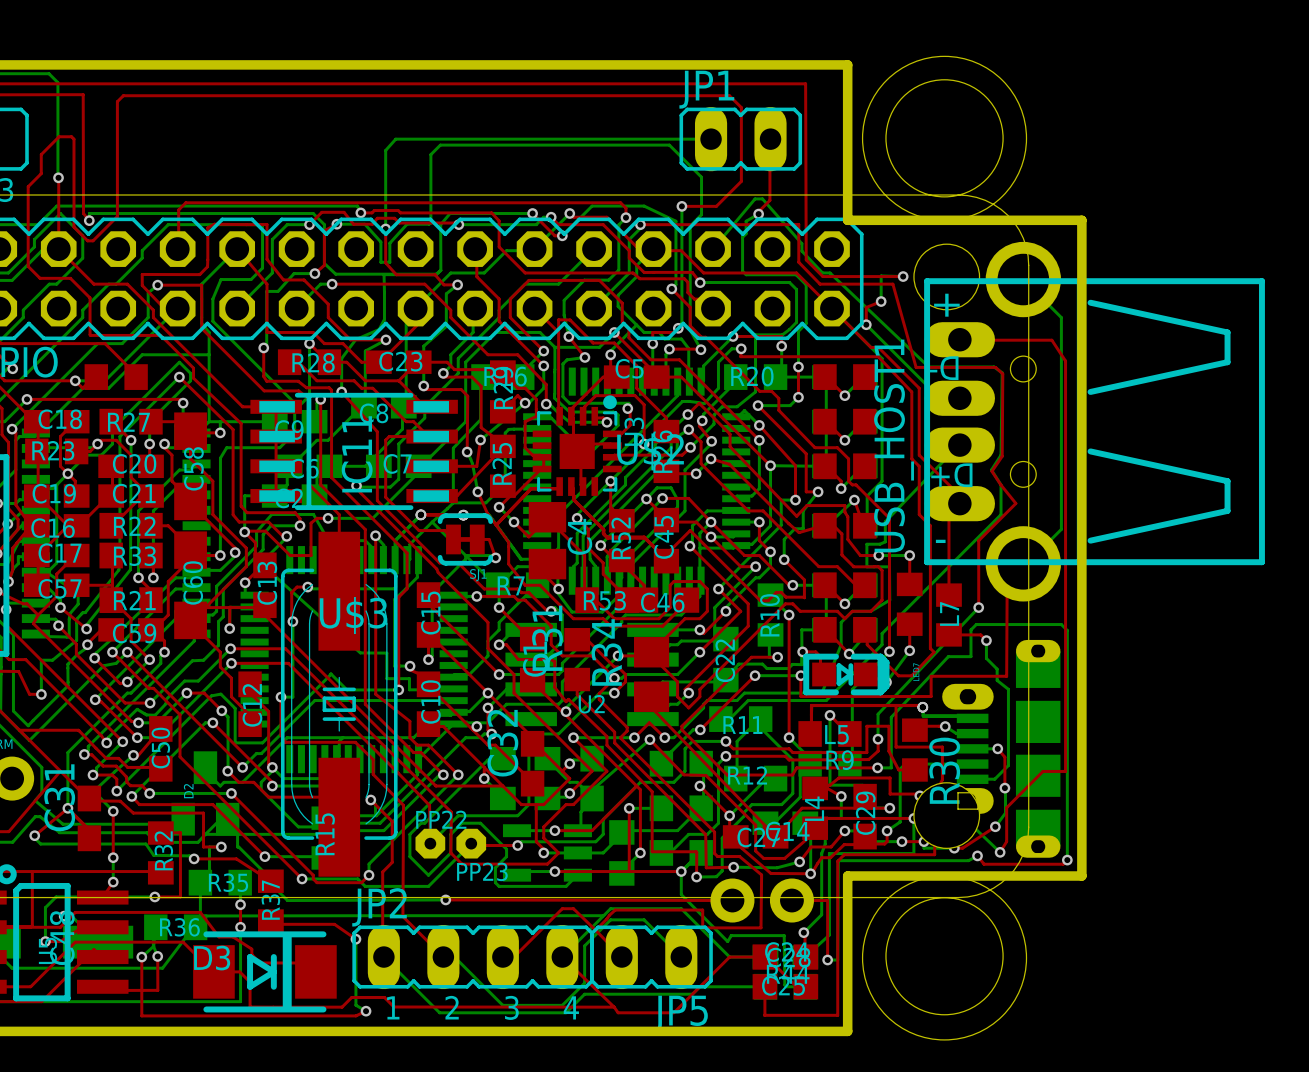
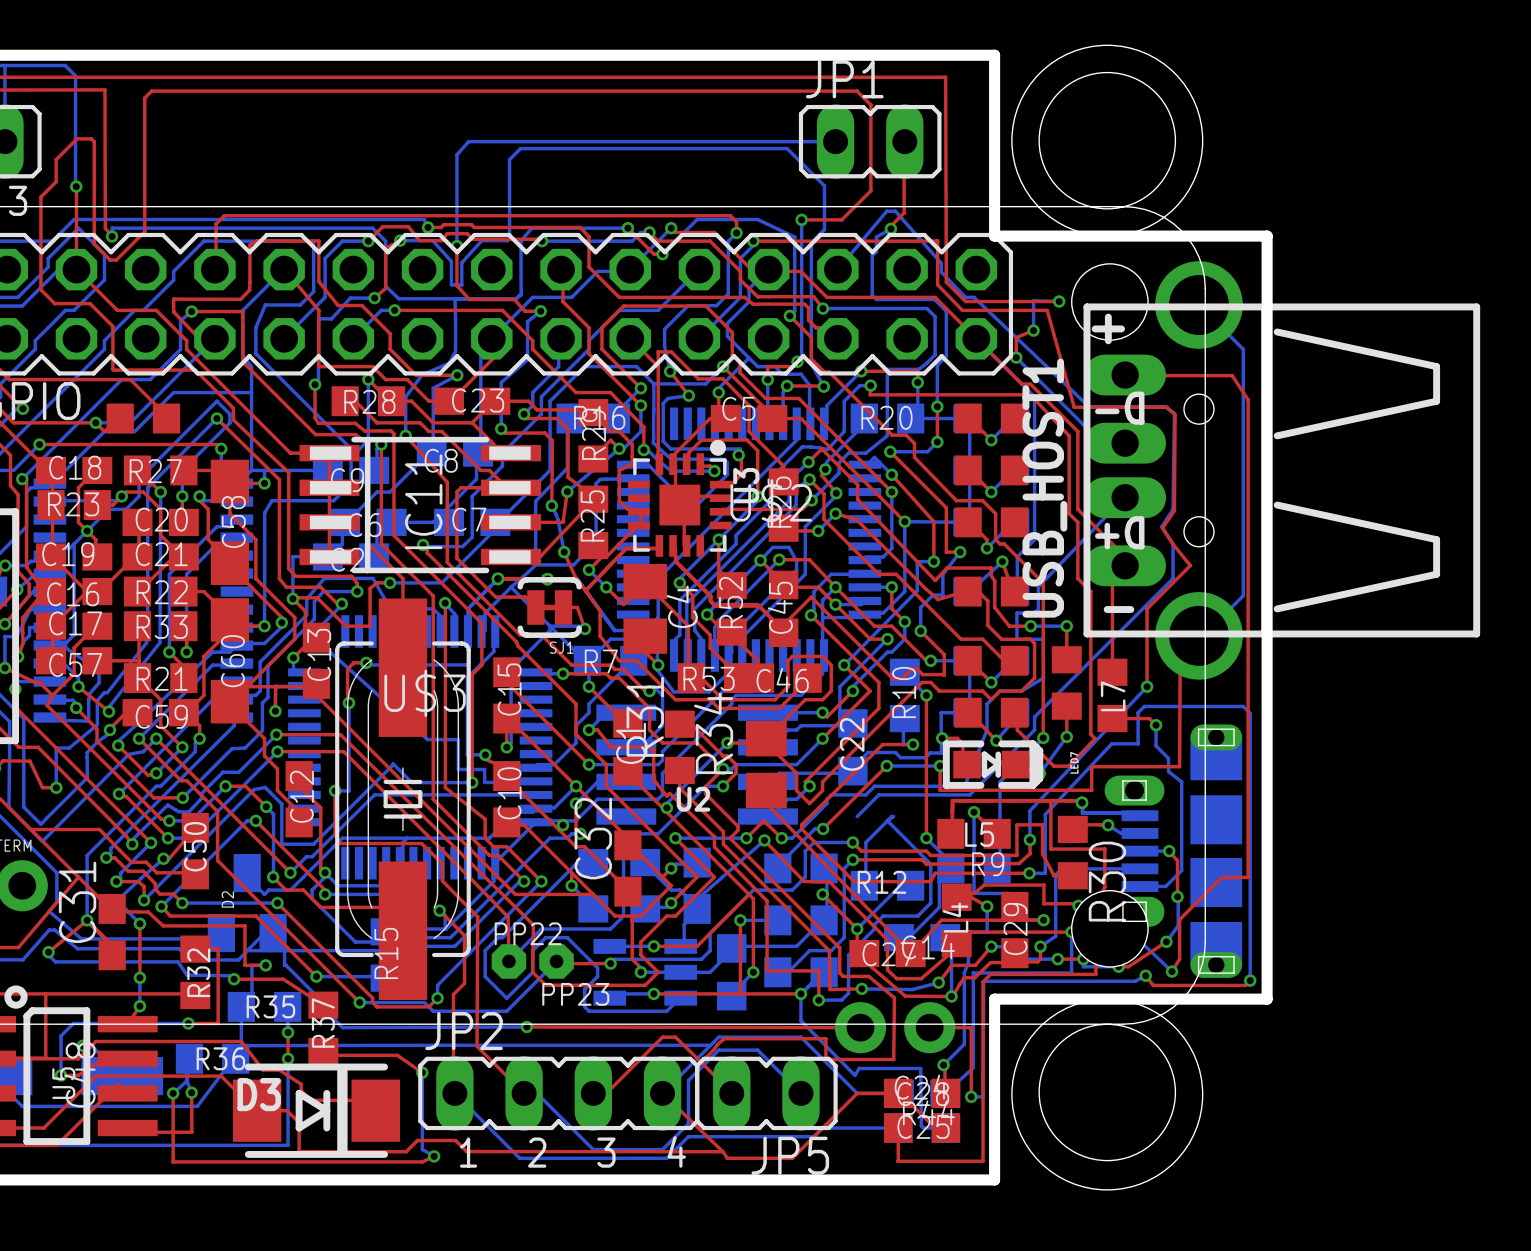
R11: (740, 719) -> none

